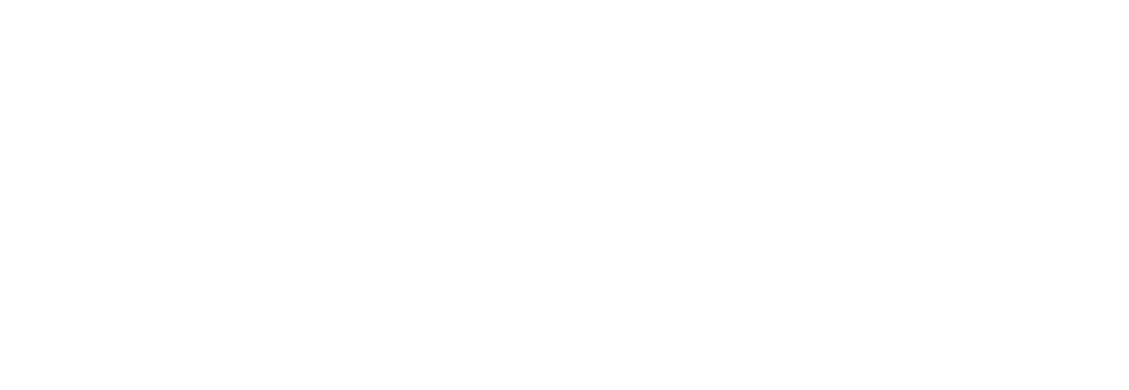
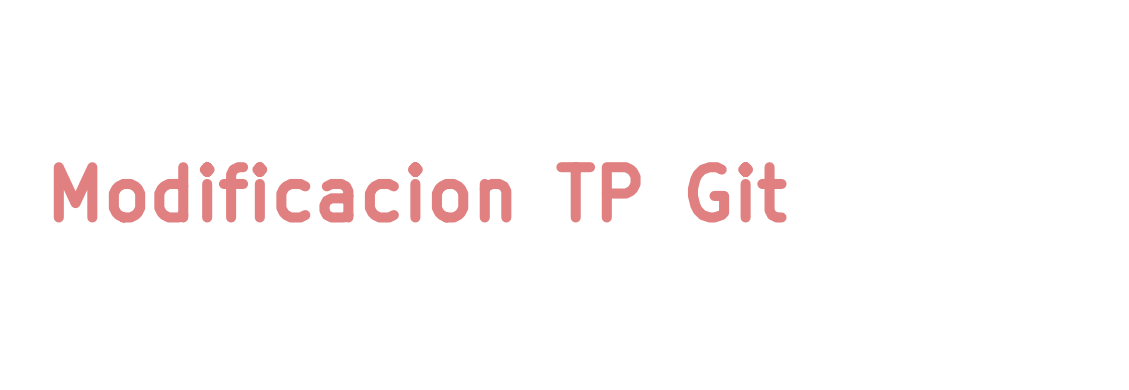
text: none -> Modificacion TP Git (420, 192)

